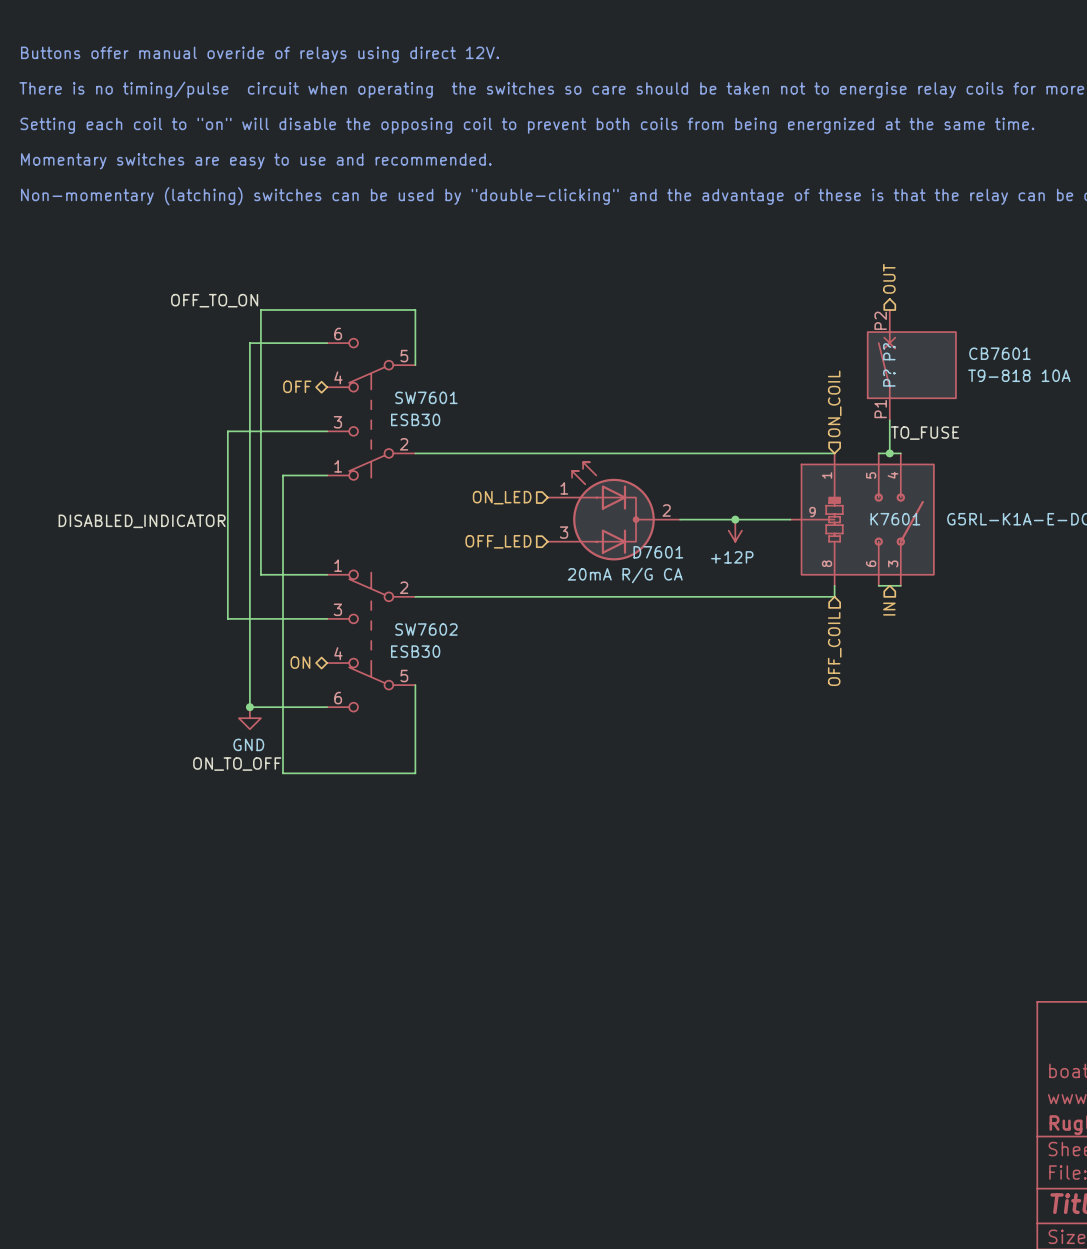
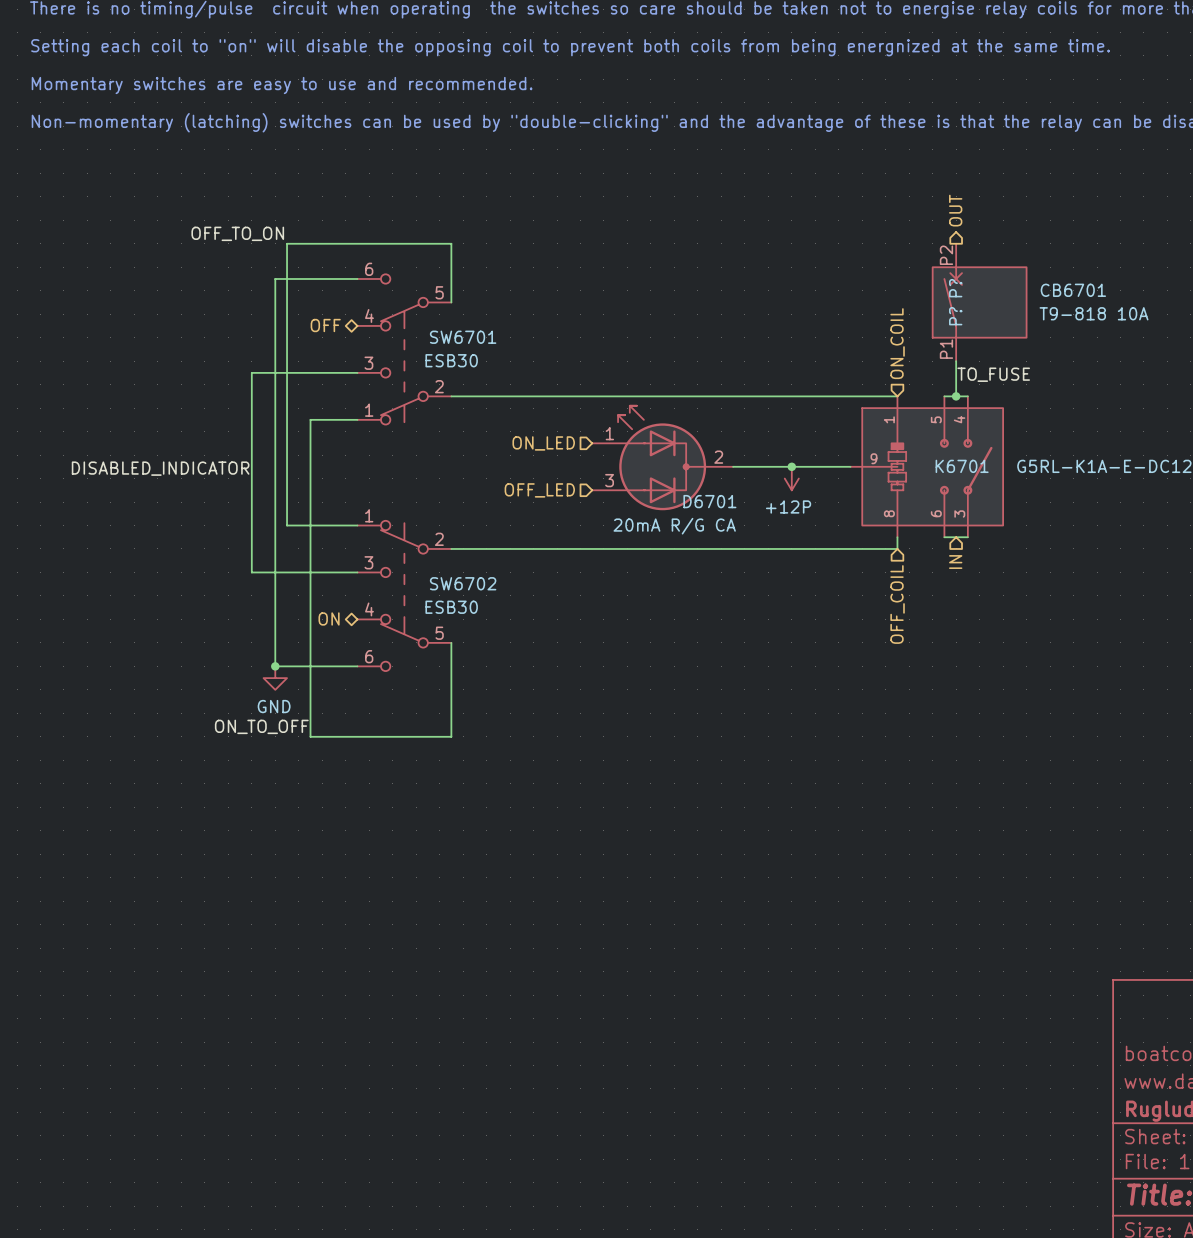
CB7601 name: CB7601 (999, 353) -> CB6701 (1073, 290)
SW7601 name: SW7601 (426, 397) -> SW6701 (463, 337)
K7601 name: K7601 (895, 519) -> K6701 (962, 466)
D7601 name: D7601 (658, 552) -> D6701 (709, 501)
SW7602 name: SW7602 (426, 629) -> SW6702 (463, 583)

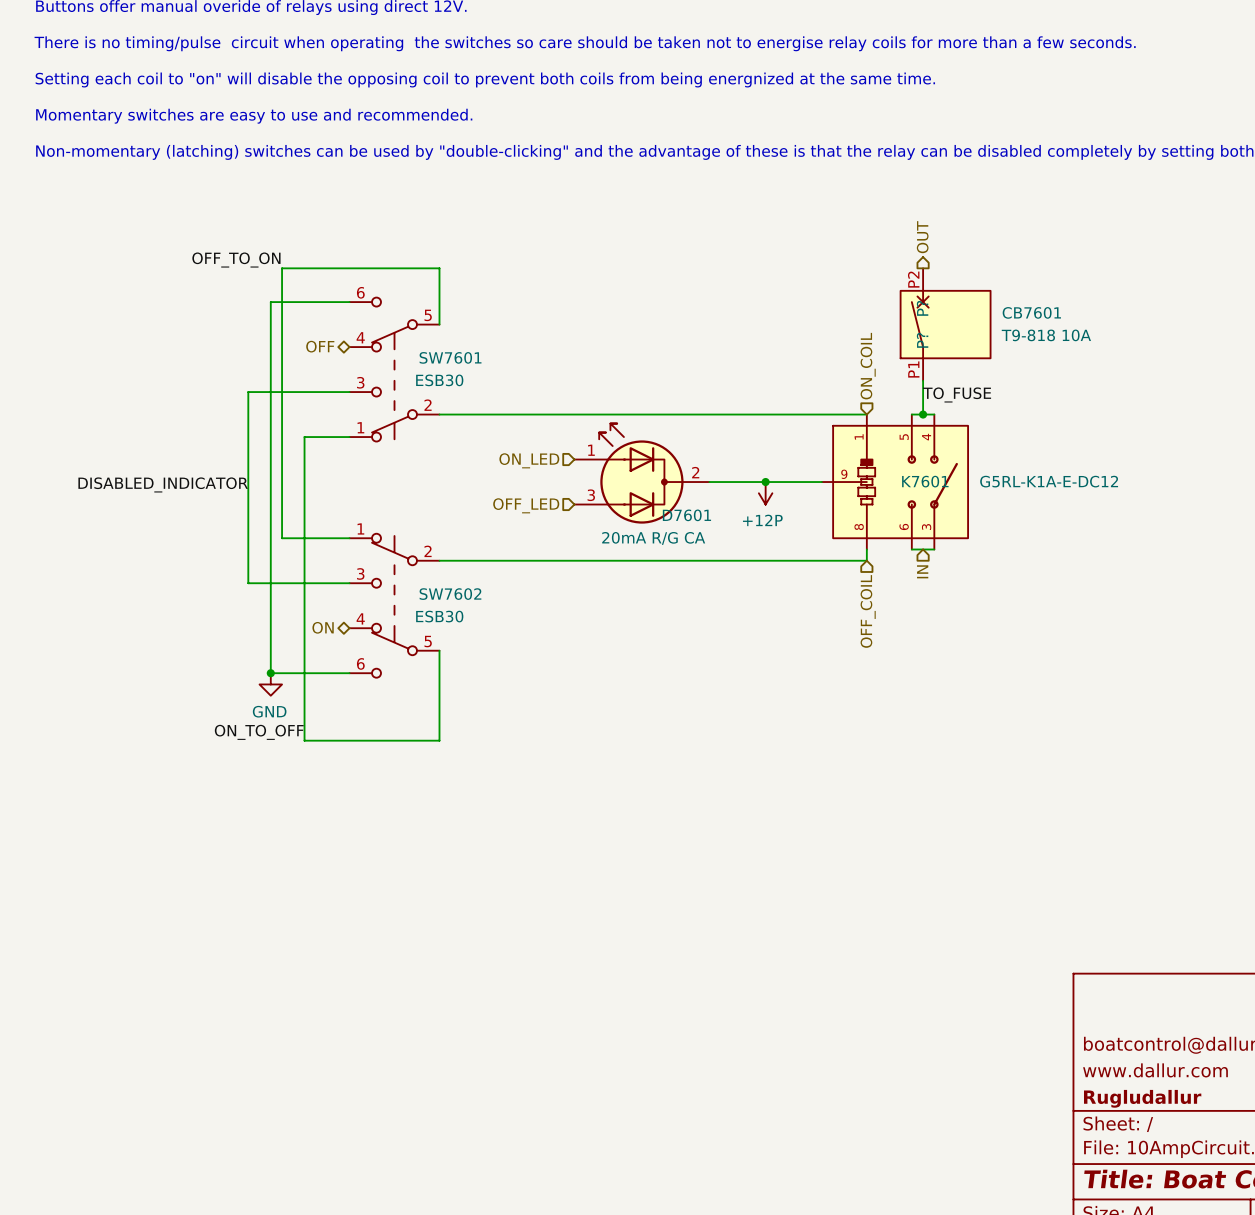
CB6701 name: CB6701 (1073, 290) -> CB7601 (1031, 312)
SW6701 name: SW6701 (463, 337) -> SW7601 (450, 357)
K6701 name: K6701 (962, 466) -> K7601 (925, 481)
D6701 name: D6701 (709, 501) -> D7601 (686, 515)
SW6702 name: SW6702 (463, 583) -> SW7602 (450, 594)

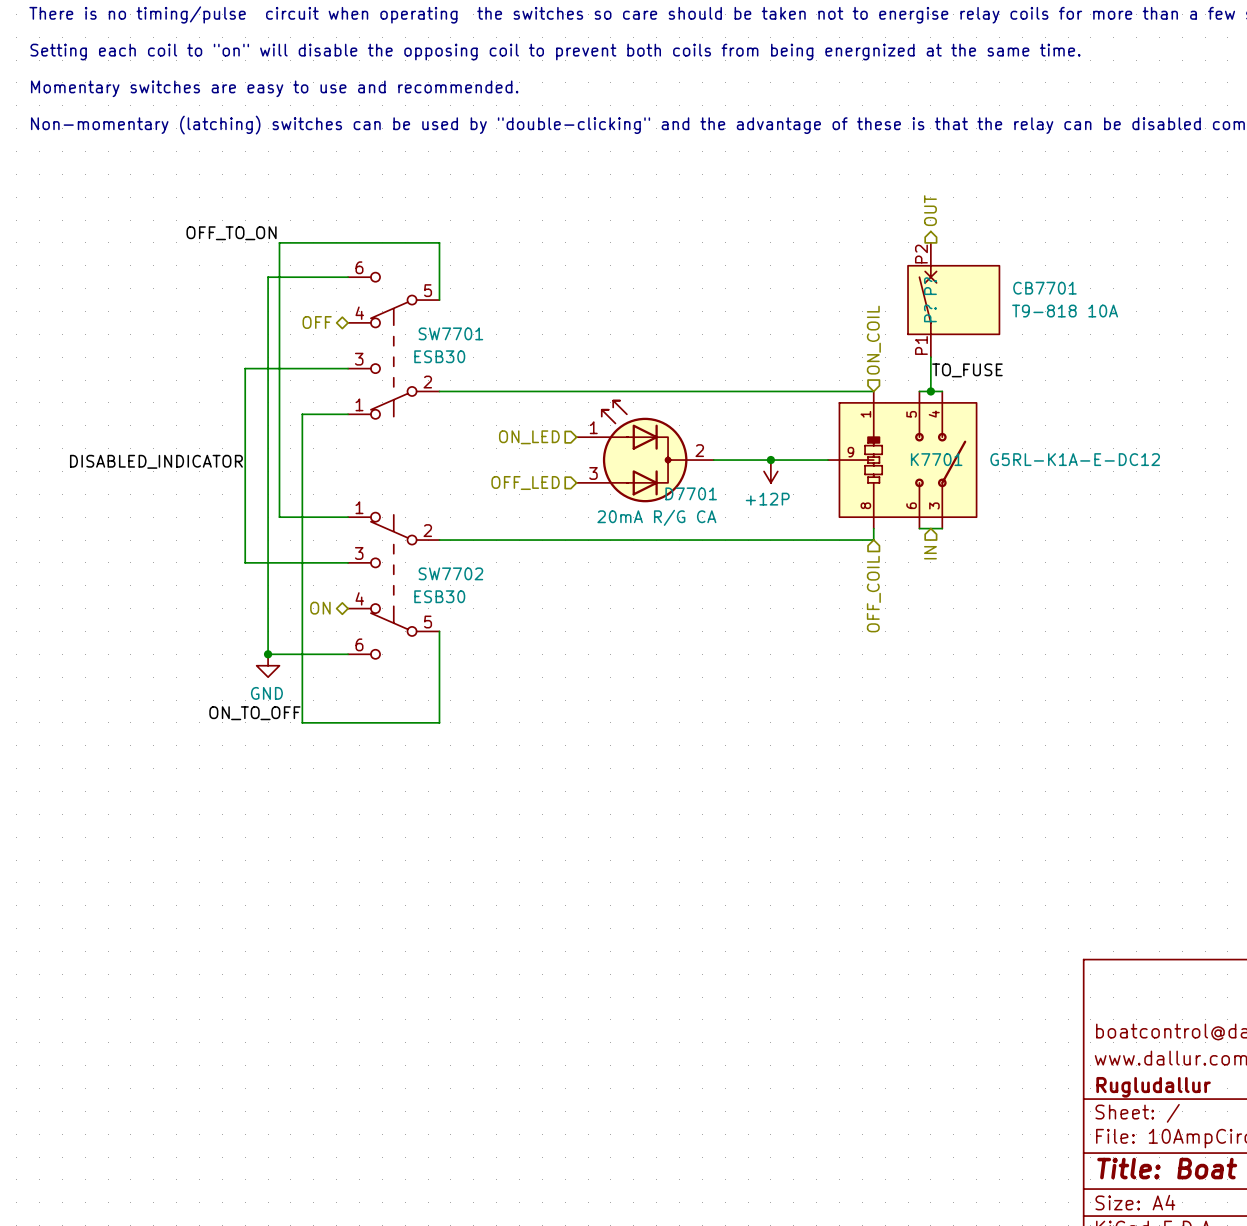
CB7601 name: CB7601 (1031, 312) -> CB7701 (1044, 288)
SW7601 name: SW7601 (450, 357) -> SW7701 (450, 333)
K7601 name: K7601 (925, 481) -> K7701 (936, 459)
D7601 name: D7601 (686, 515) -> D7701 (691, 493)
SW7602 name: SW7602 (450, 594) -> SW7702 (450, 573)

